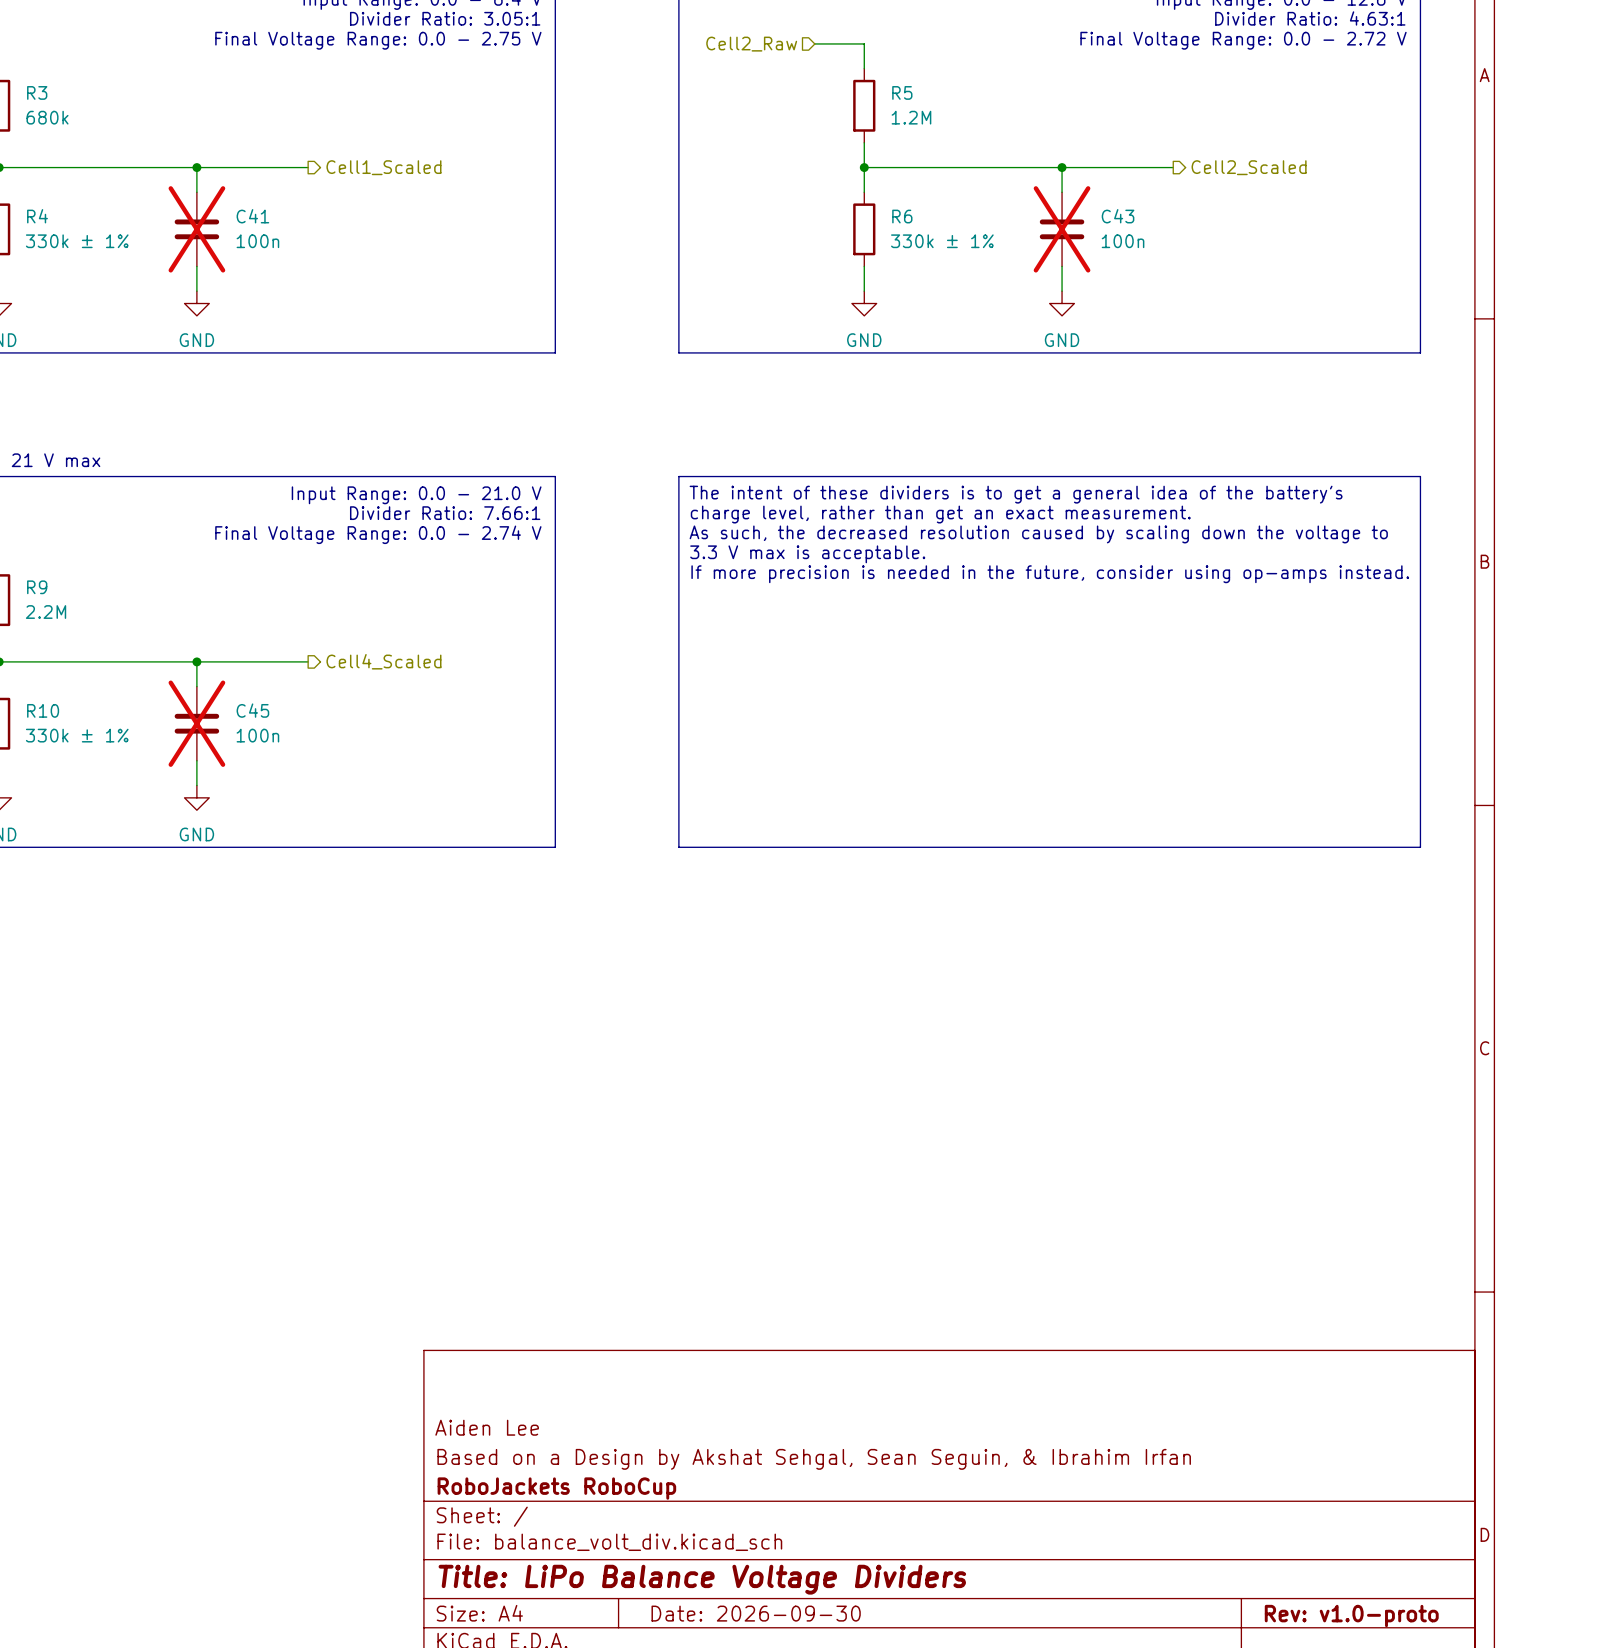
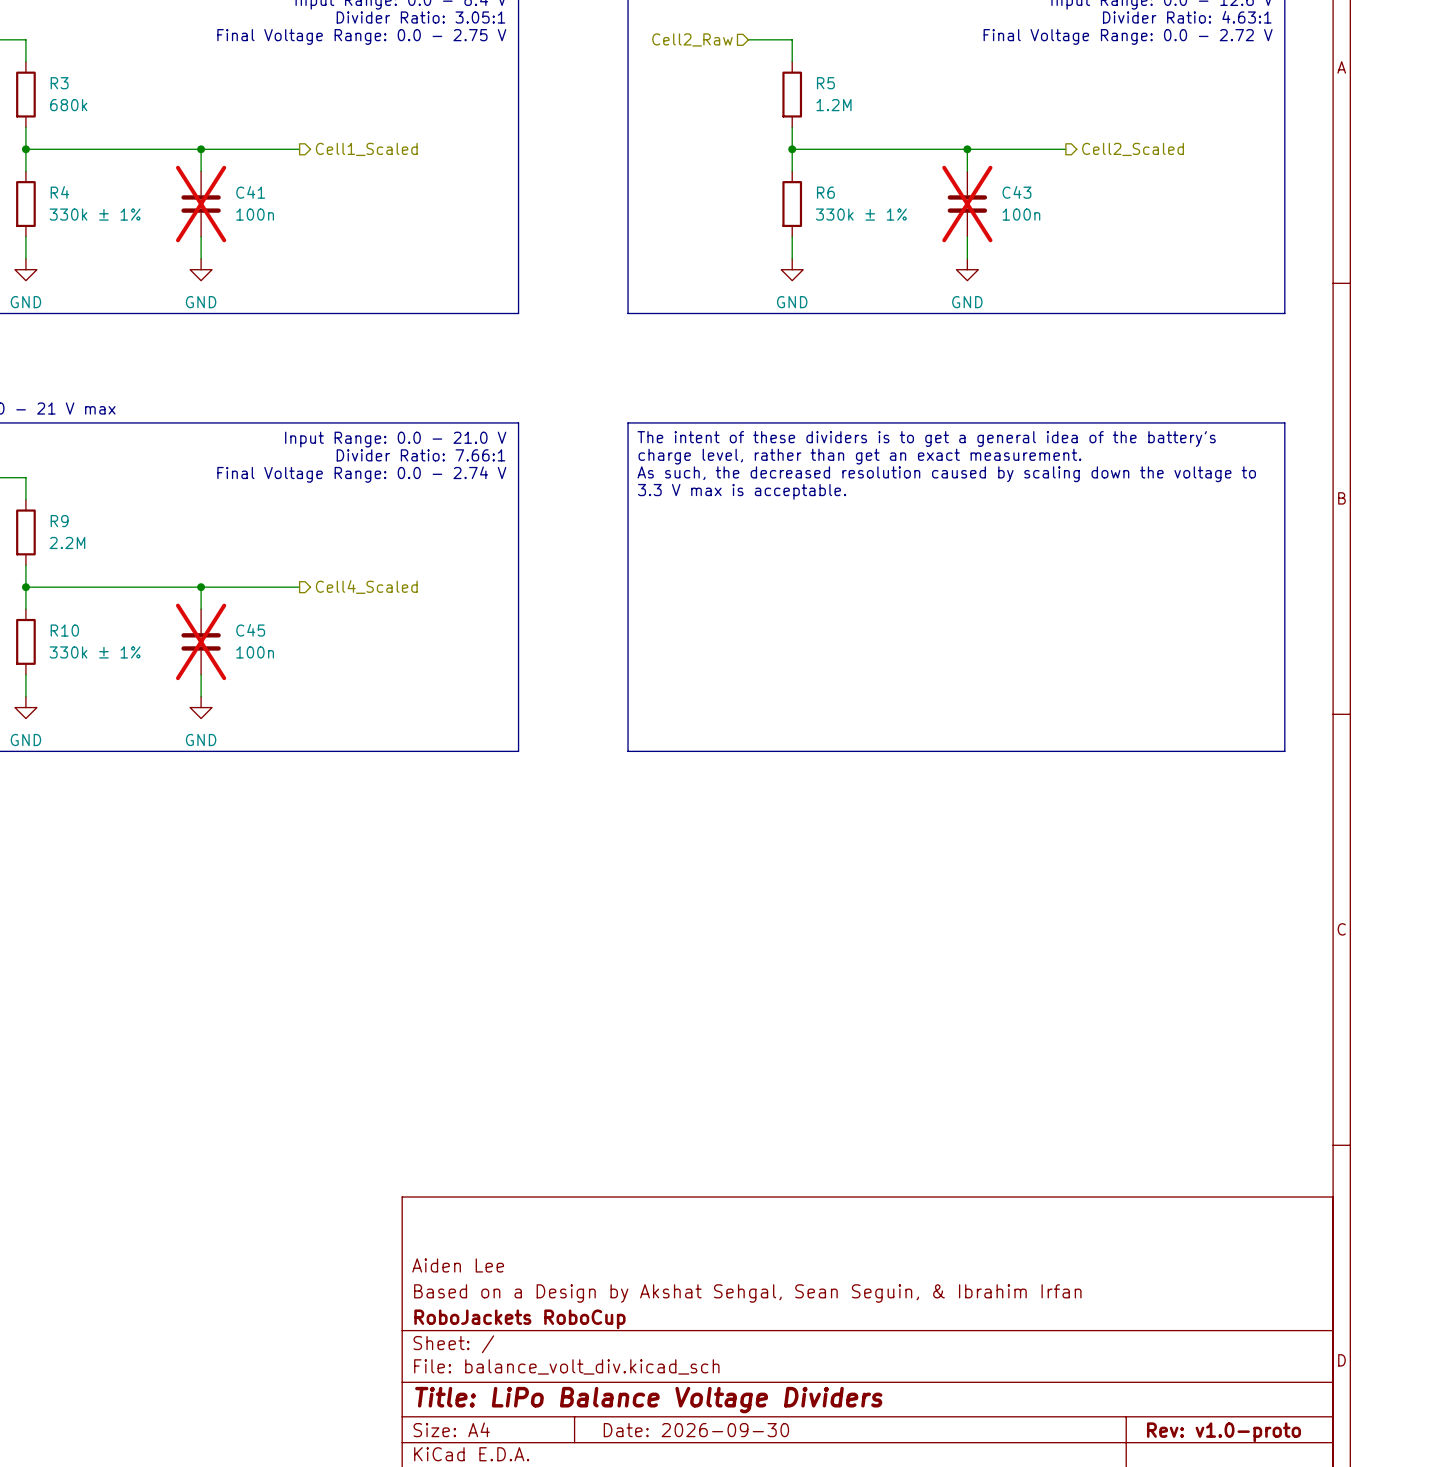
text: If more precision is needed in the future, consider using op-amps instead. (1050, 574) -> none

